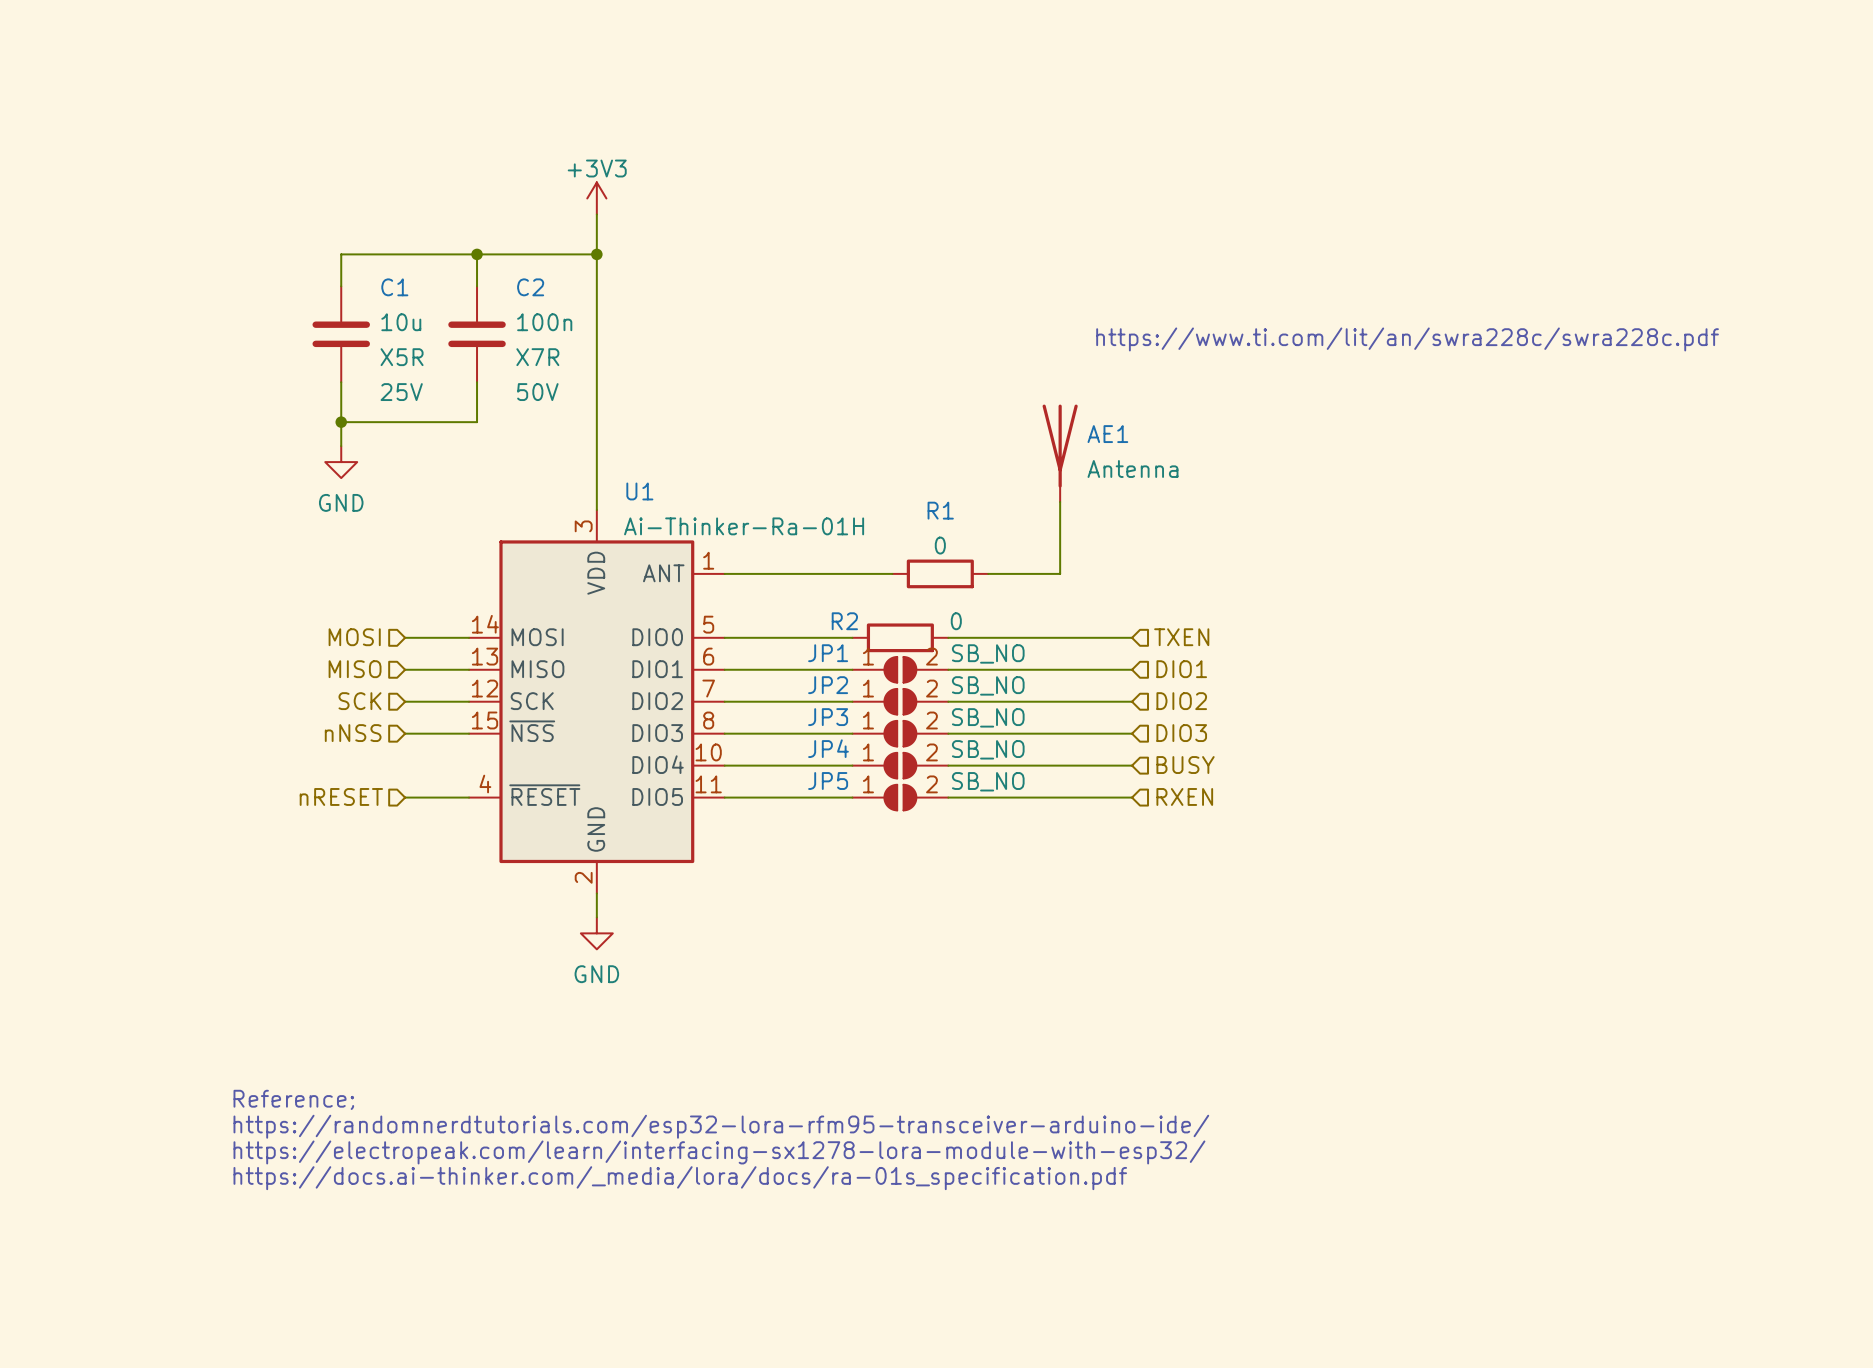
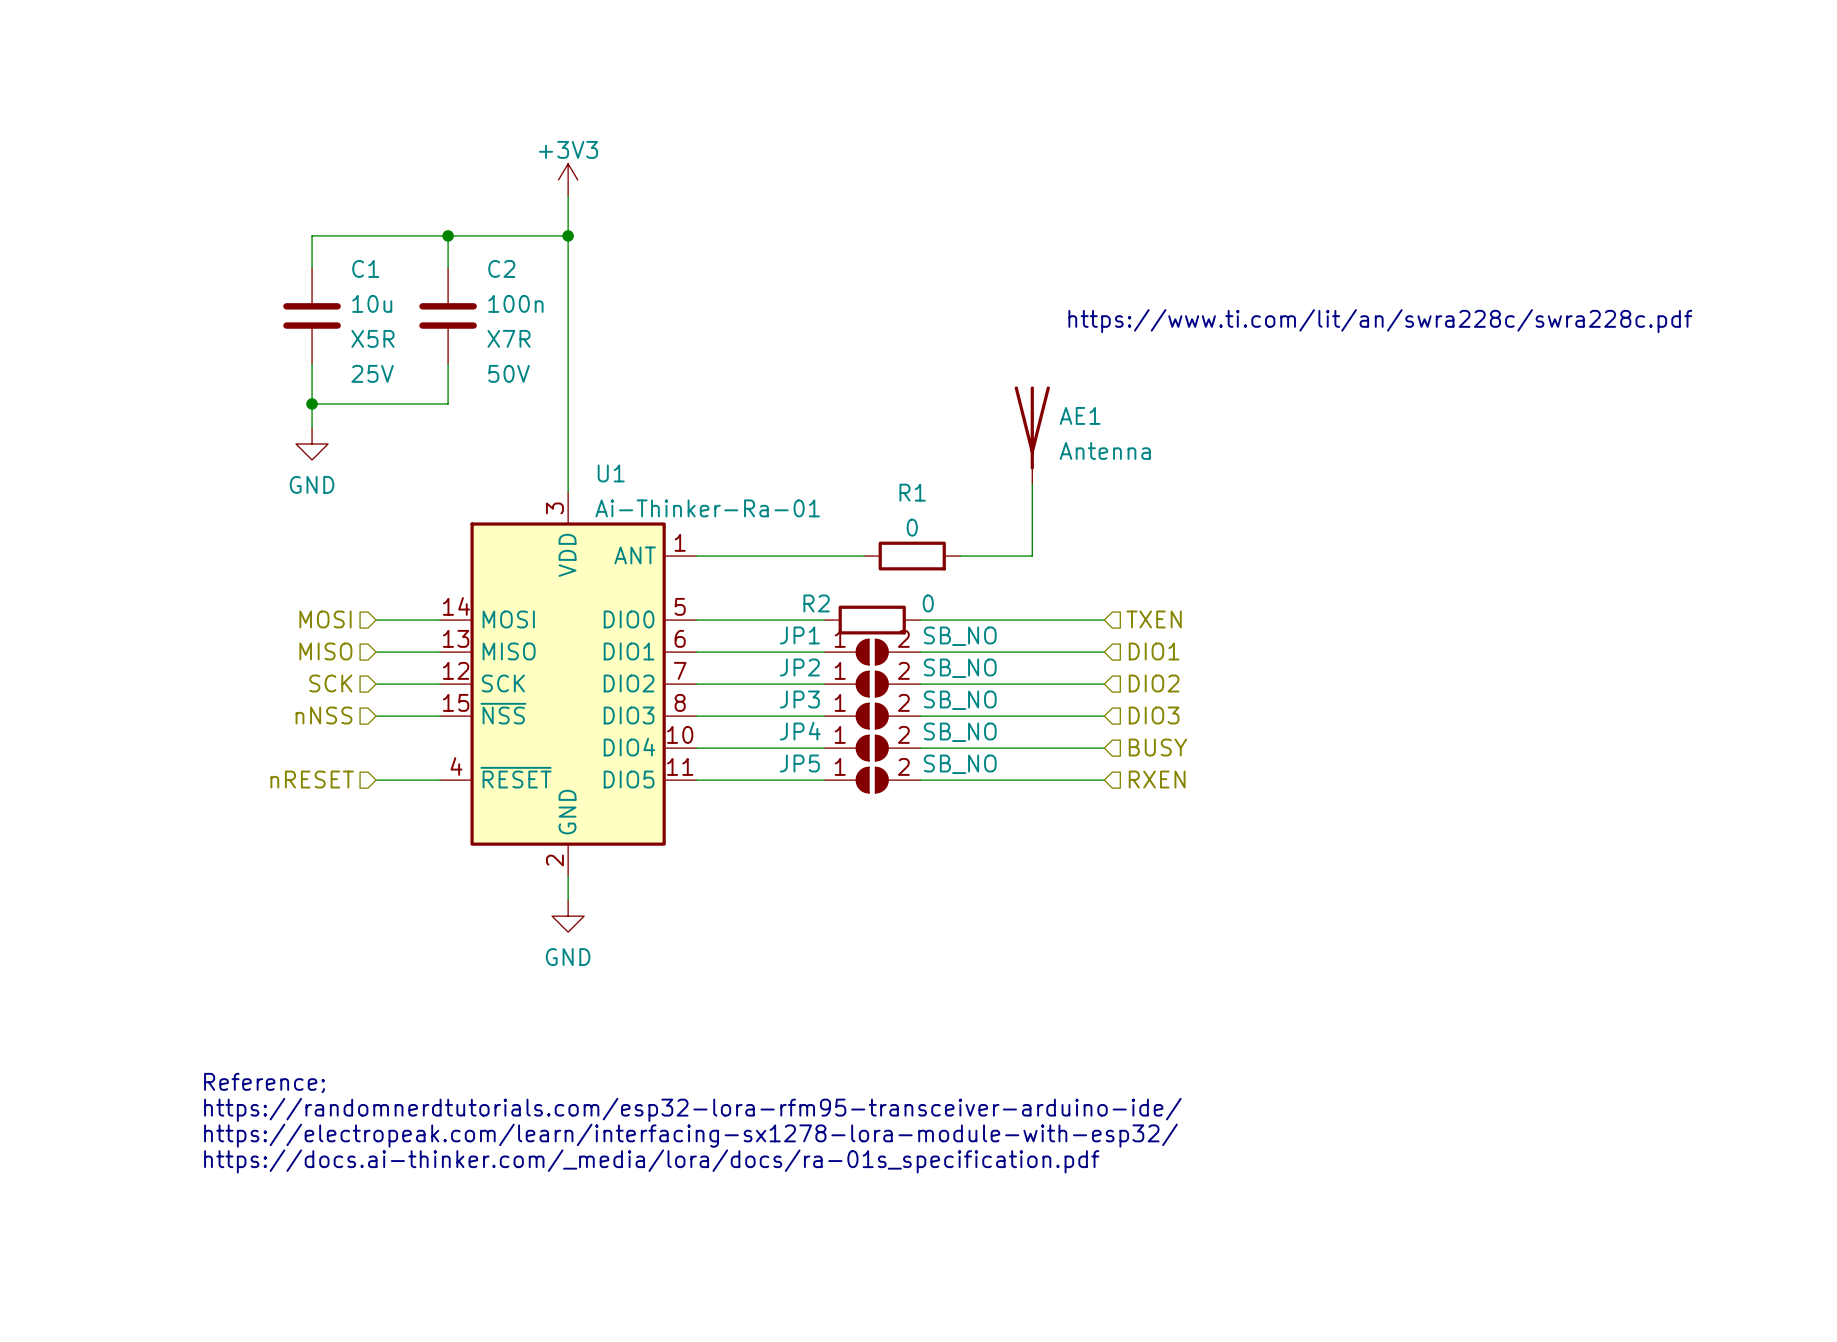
U1 value: Ai-Thinker-Ra-01H (744, 526) -> Ai-Thinker-Ra-01 (707, 508)

